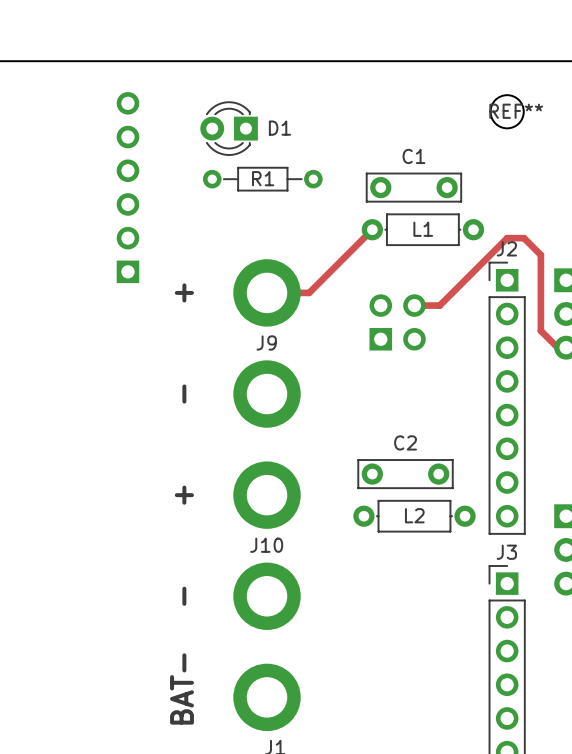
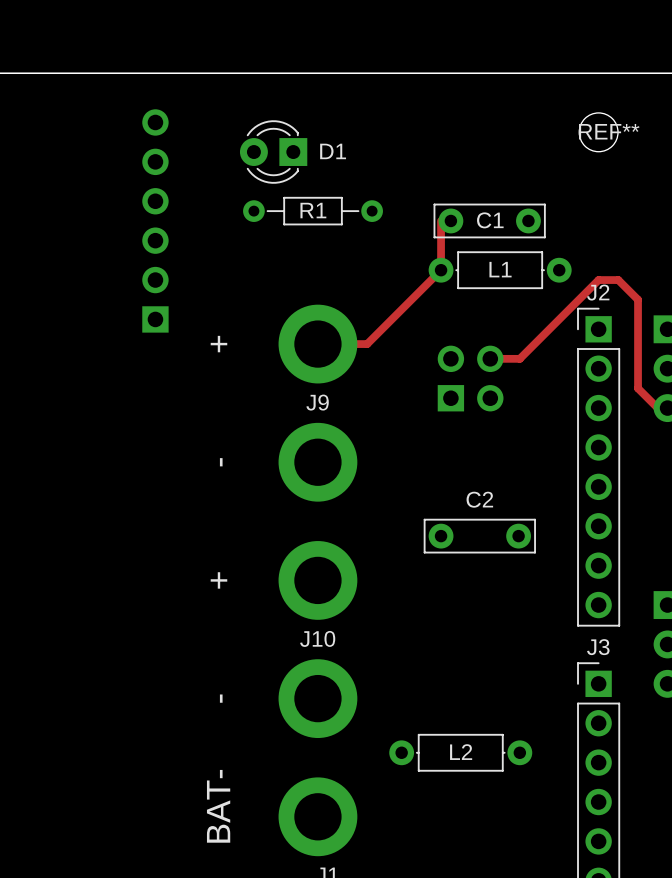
C1 name position: C1 (413, 156) -> C1 (490, 220)
track: none -> (441, 220) (441, 270)
C2 position: (405, 474) -> (479, 536)
L2 position: (414, 516) -> (460, 752)

